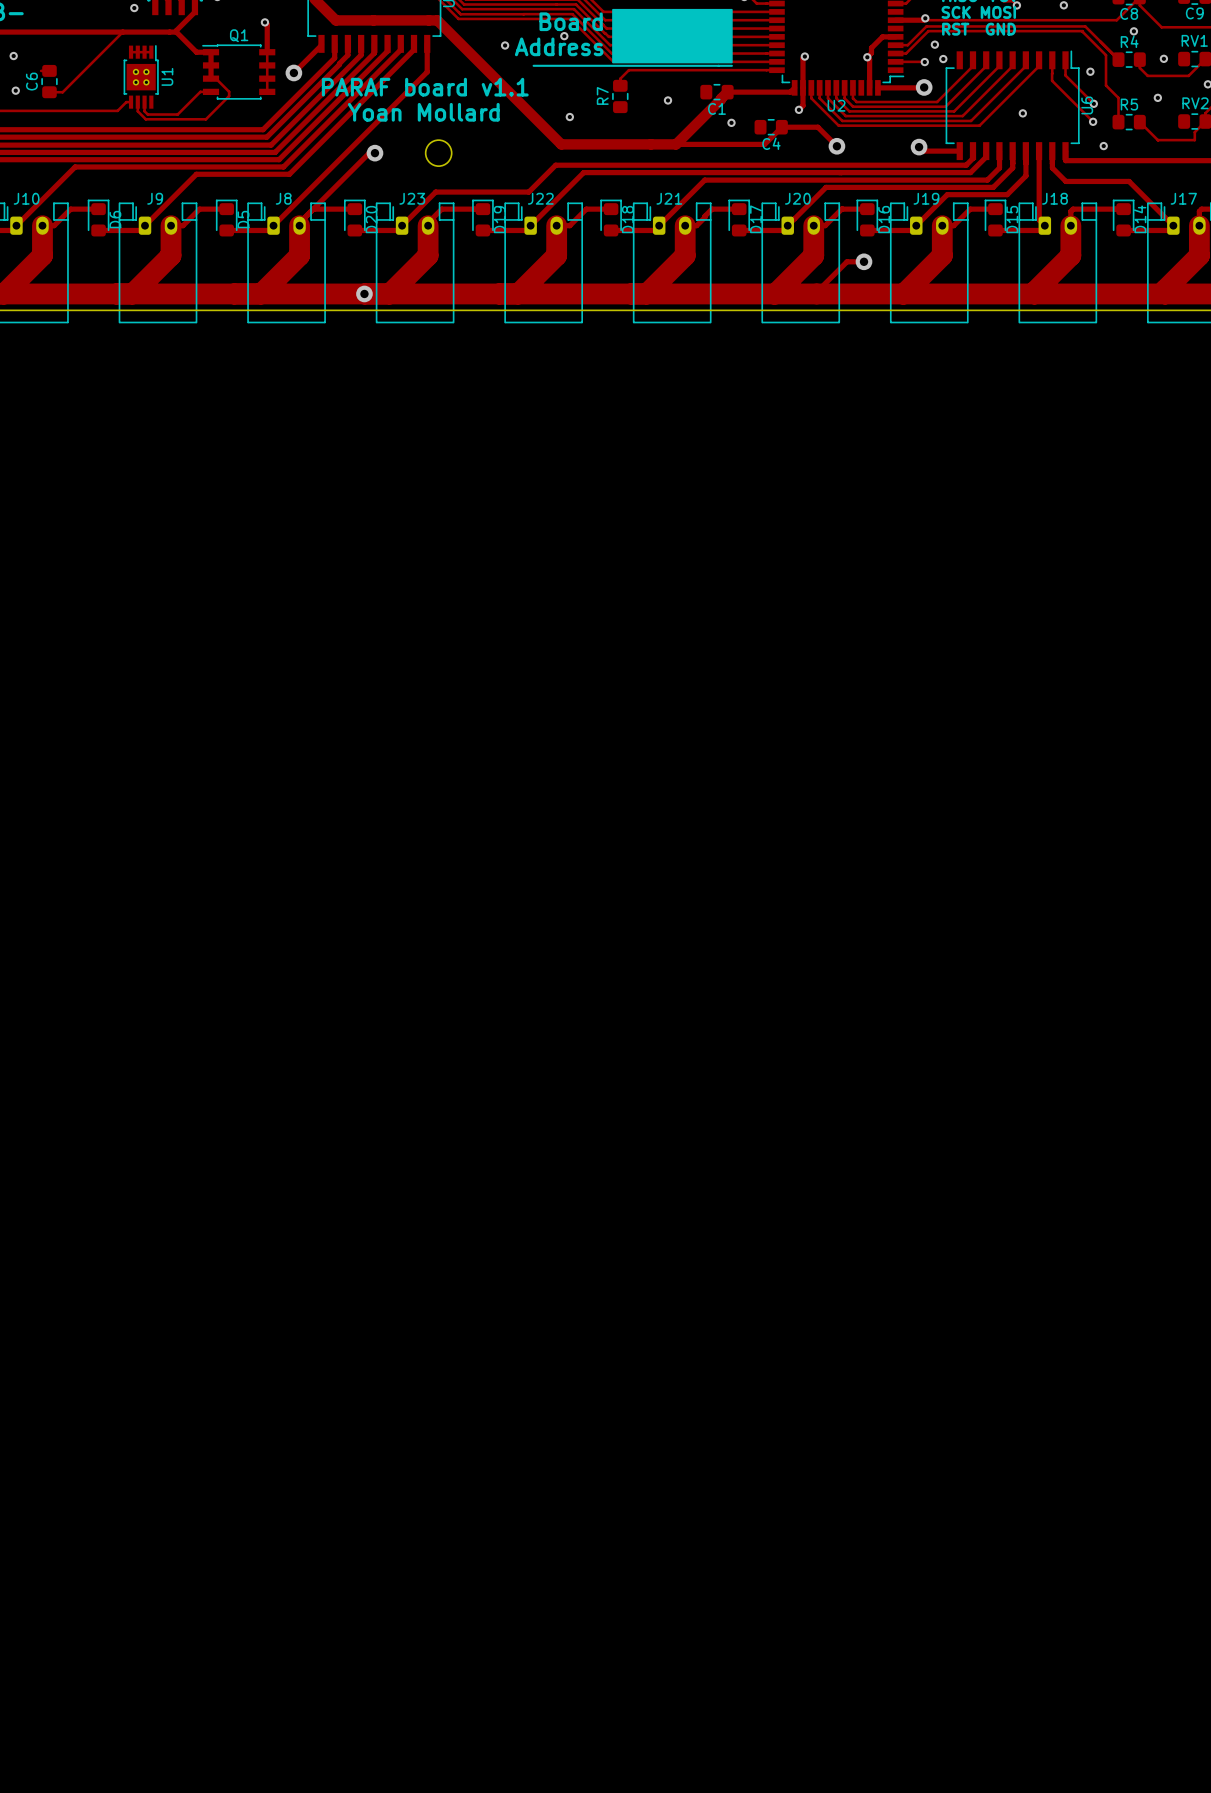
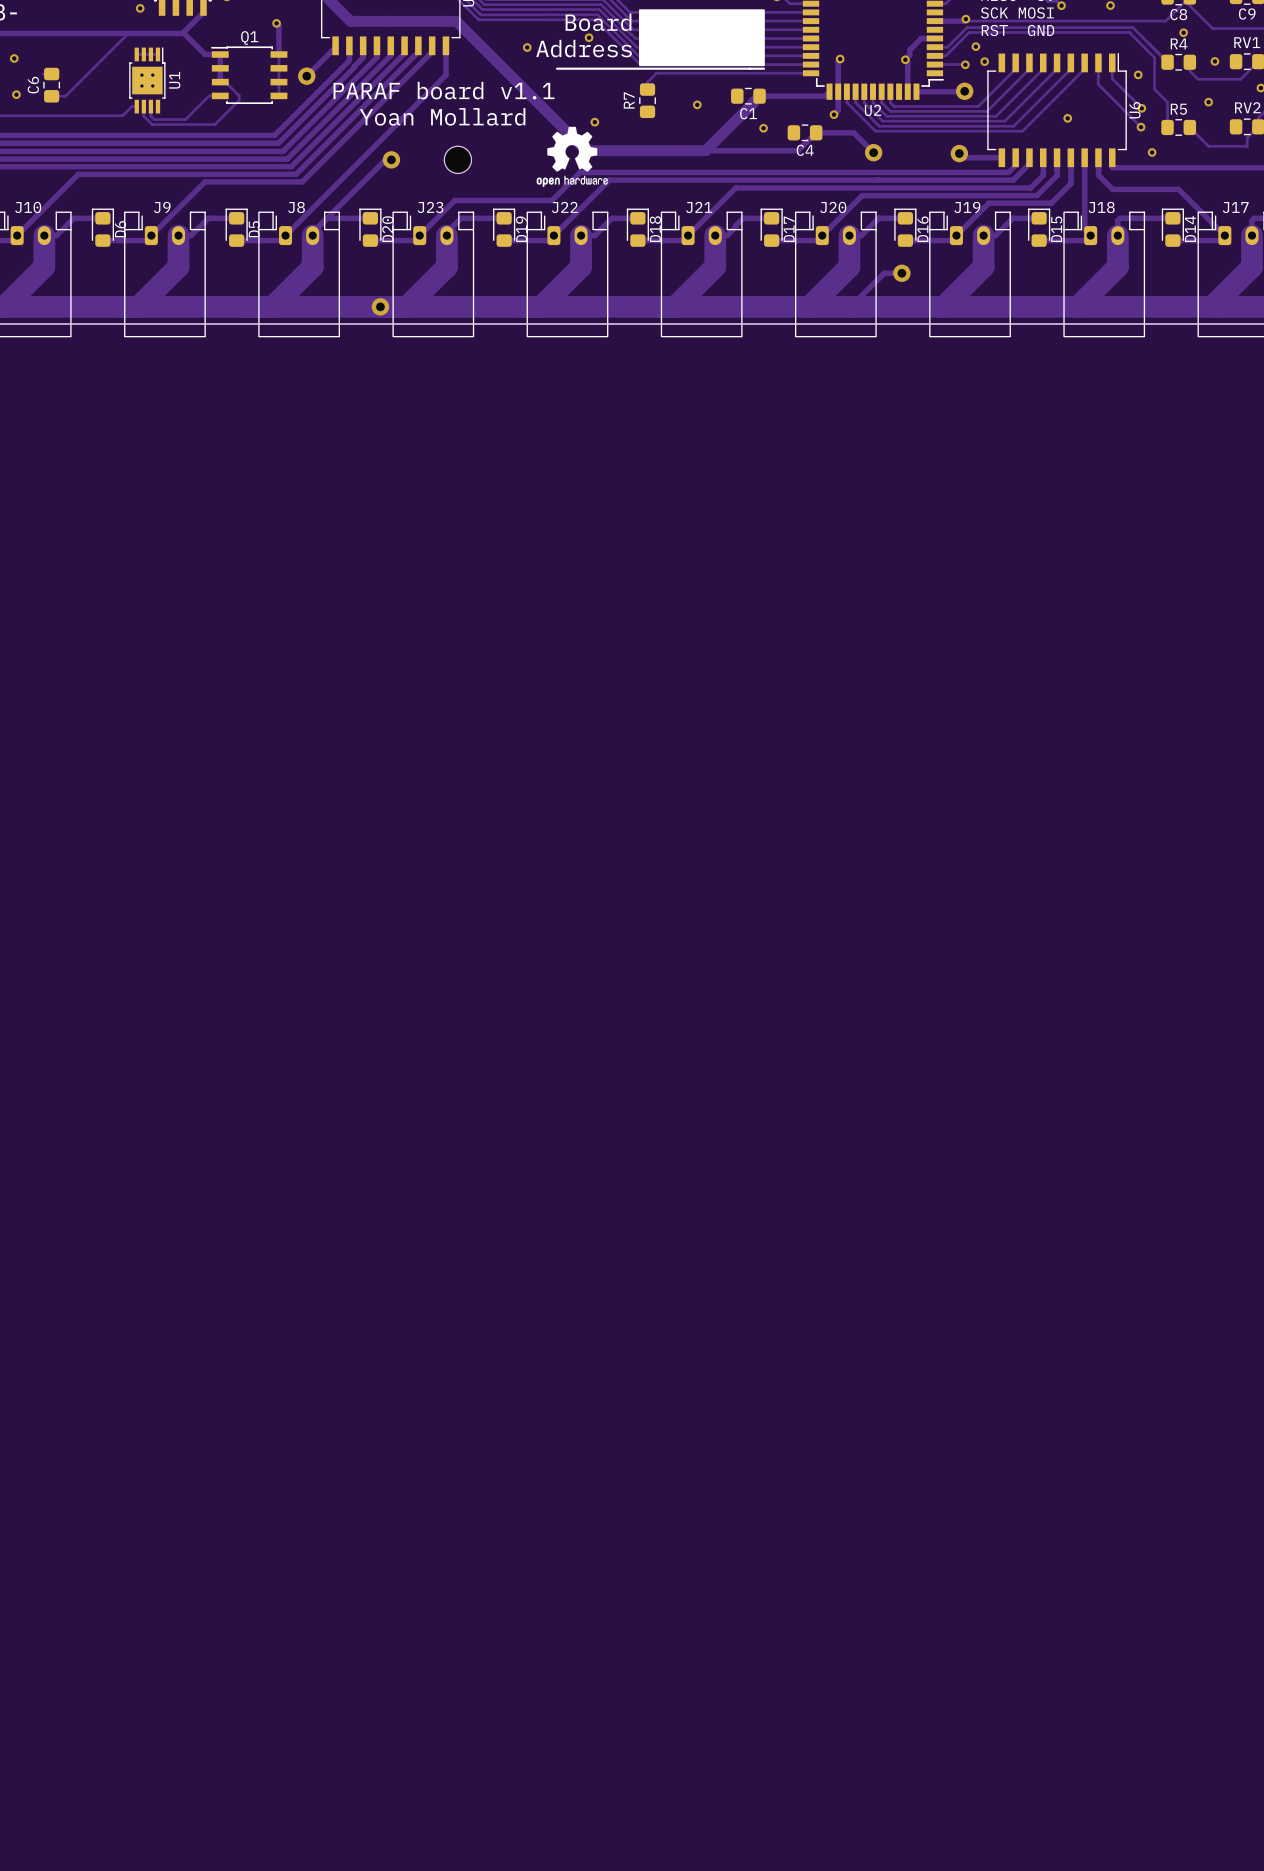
drawing: none -> [536, 126, 608, 188]

